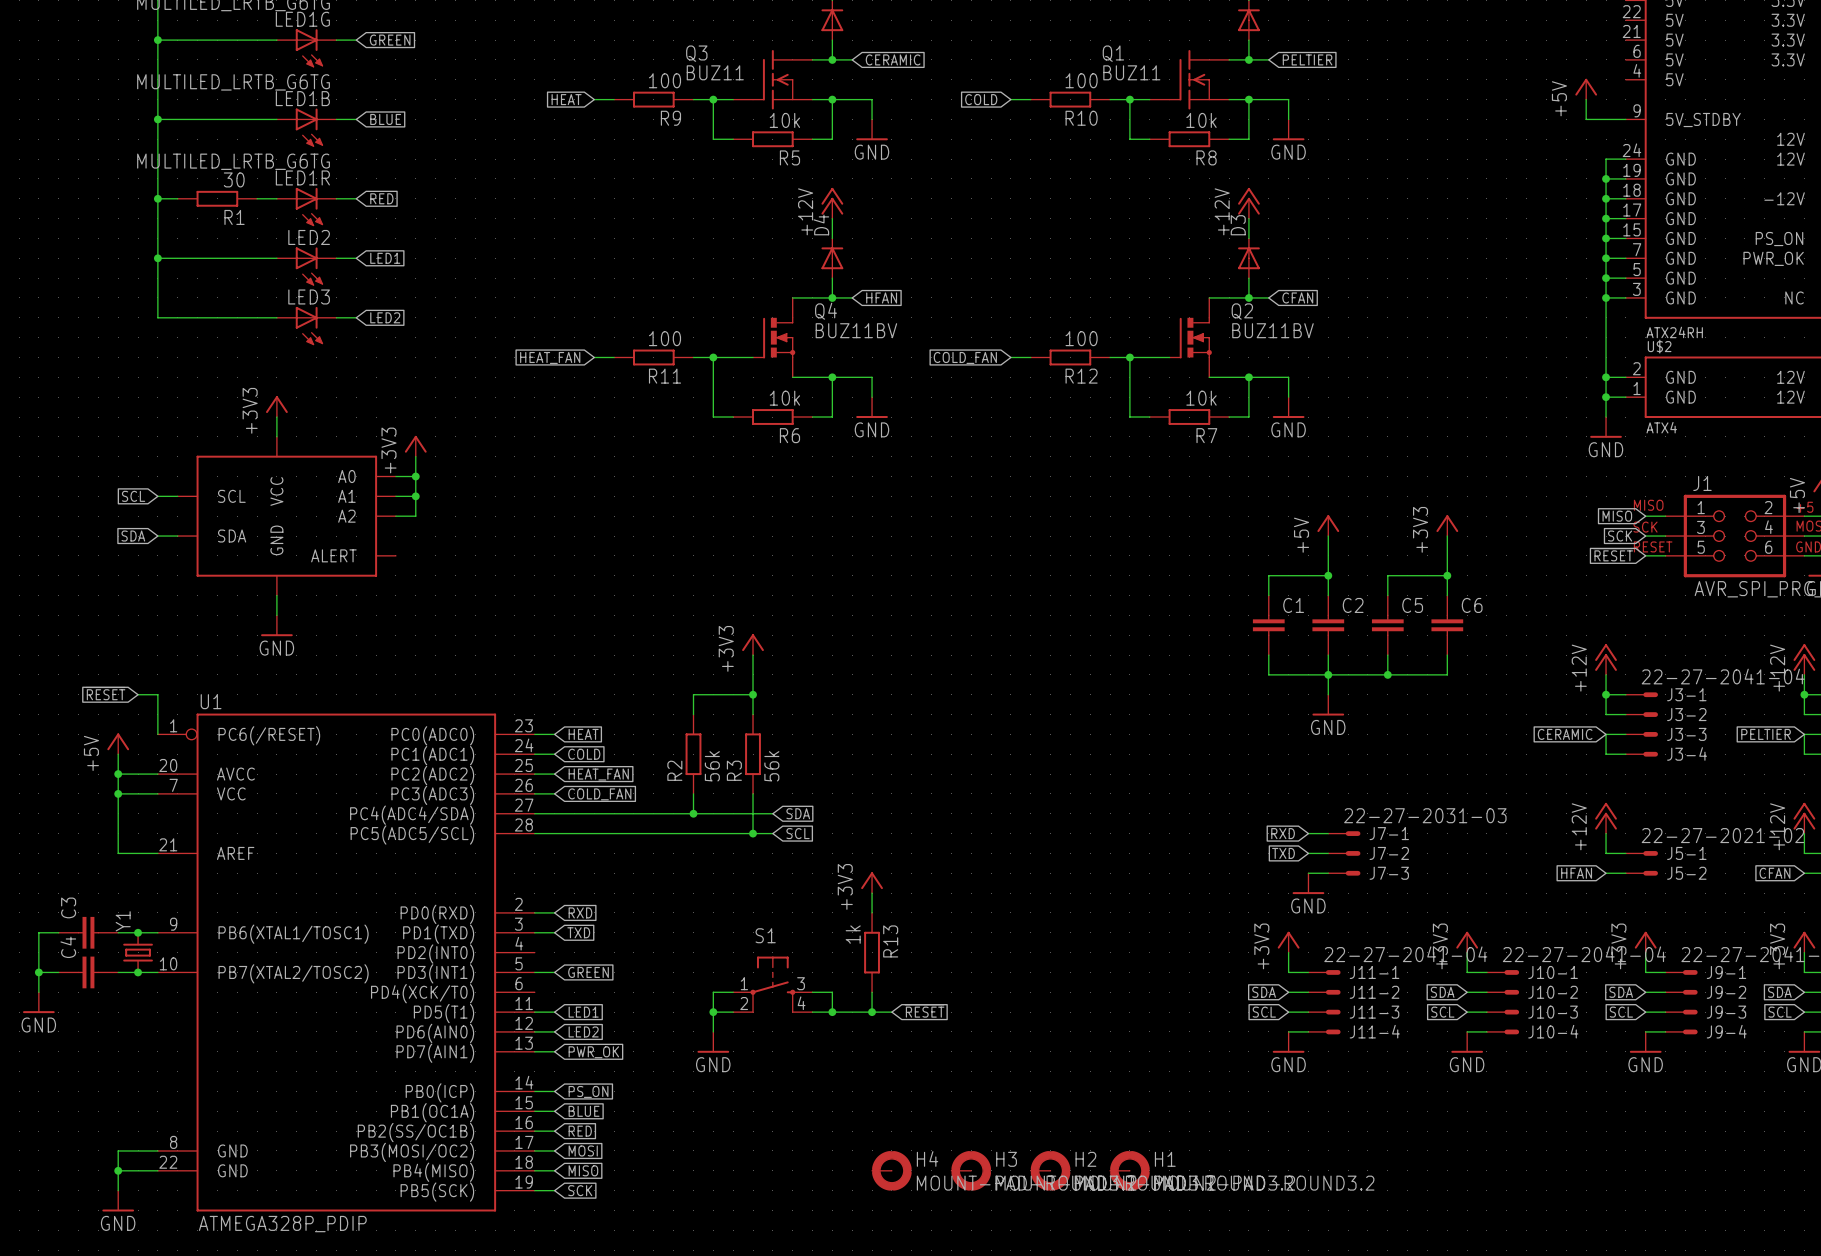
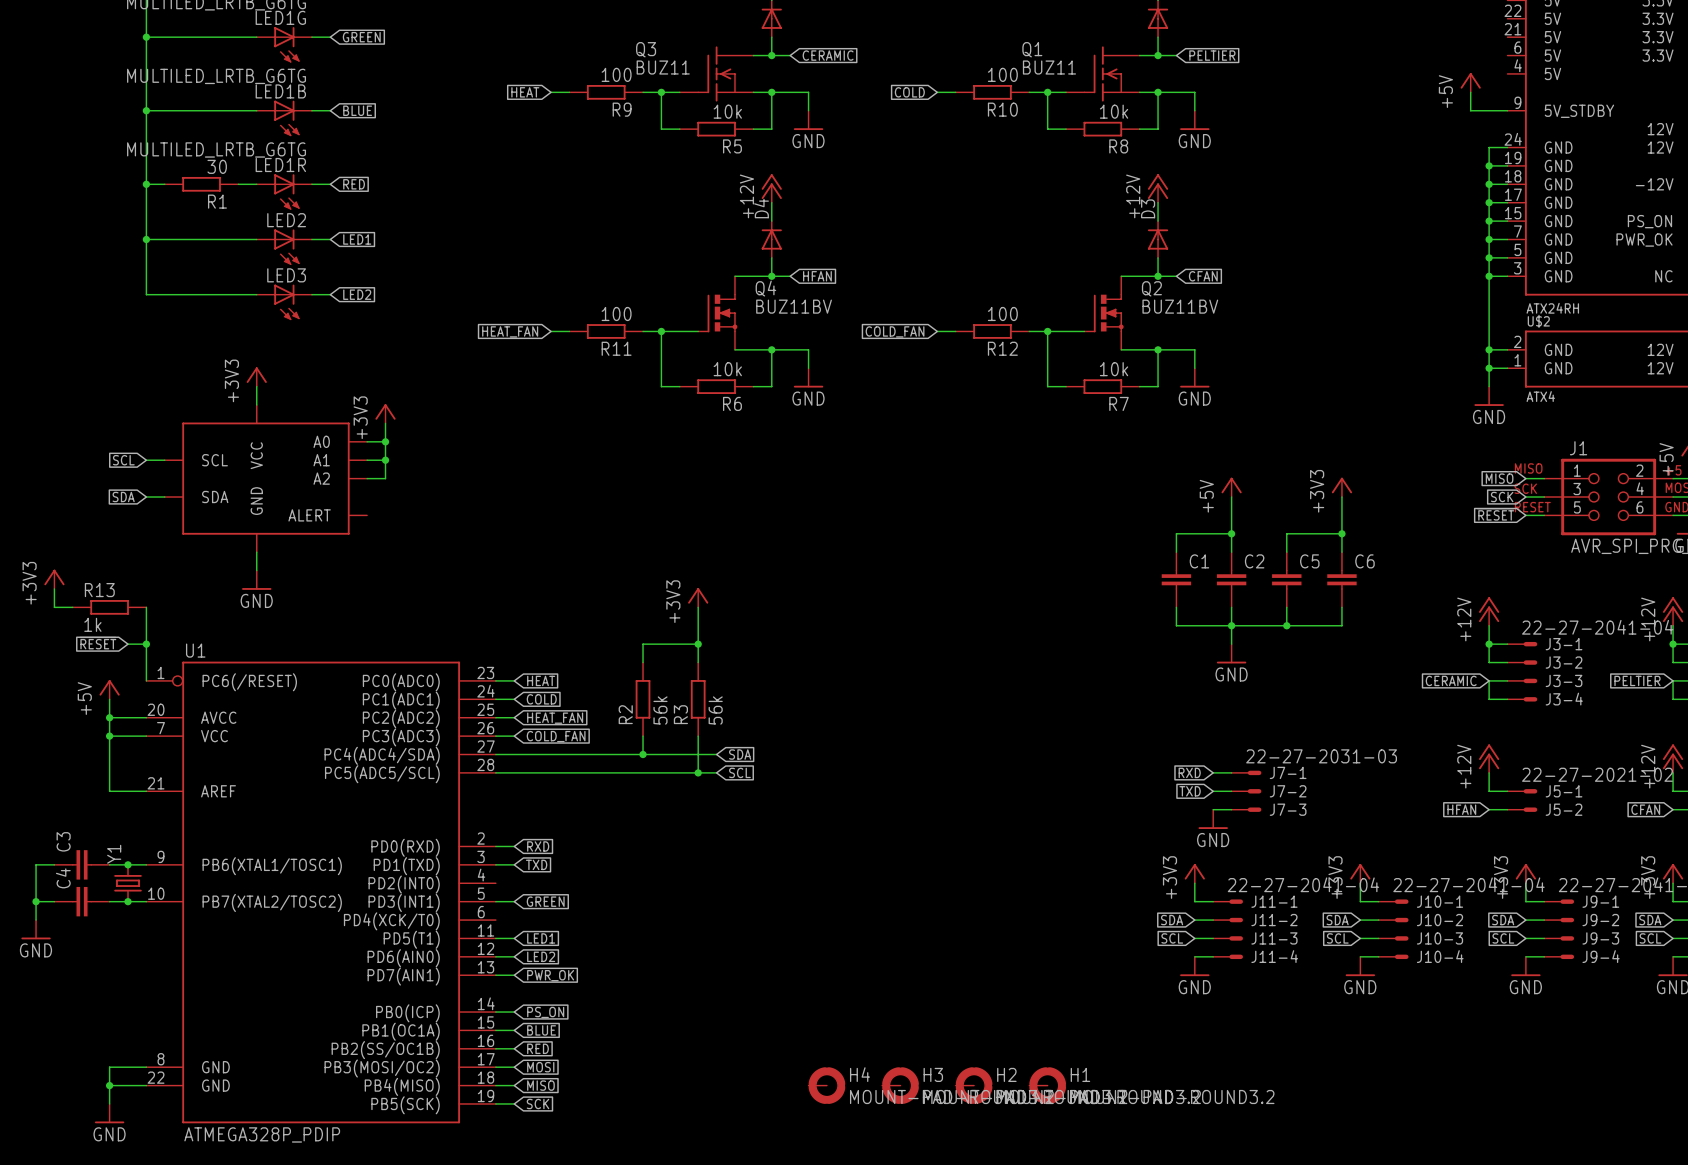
power symbol: none -> +3V3 (54, 579)
wire: none -> (54, 588) (54, 607) (72, 607)
wire: none -> (146, 607) (146, 644)
junction: none -> (146, 644)
power symbol: +3V3 (872, 882) -> none
wire: (872, 893) (872, 912) -> none
R13 value position: 1k (853, 934) -> 1k (92, 624)
R13 name position: R13 (890, 941) -> R13 (99, 590)
R13 rotation: 0° (872, 952) -> 90° clockwise (109, 607)
R13 position: (872, 952) -> (109, 607)
S1: (772, 984) -> none
wire: (733, 992) (713, 992) (713, 1031) -> none
wire: (812, 992) (832, 992) (832, 1012) -> none
wire: (872, 992) (872, 1012) -> none
global label: ~{RESET} (924, 1010) -> none
wire: (713, 1012) (733, 1012) -> none
junction: (713, 1012) -> none
wire: (812, 1012) (891, 1012) -> none
junction: (832, 1012) -> none
junction: (872, 1012) -> none
power symbol: GND (713, 1042) -> none

